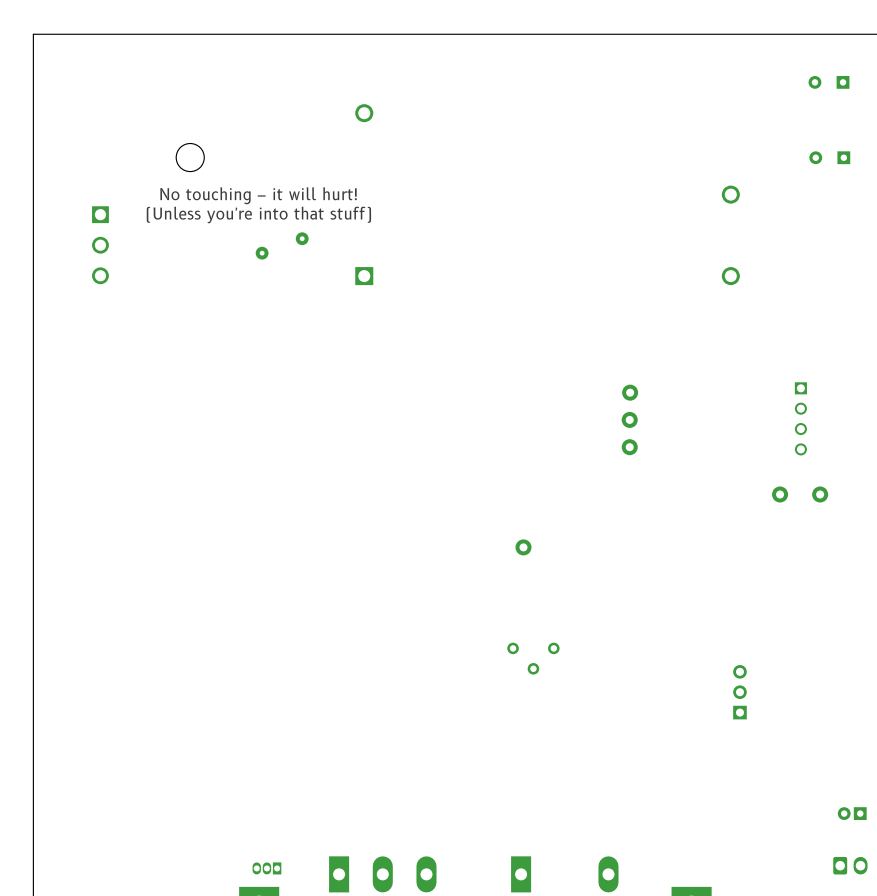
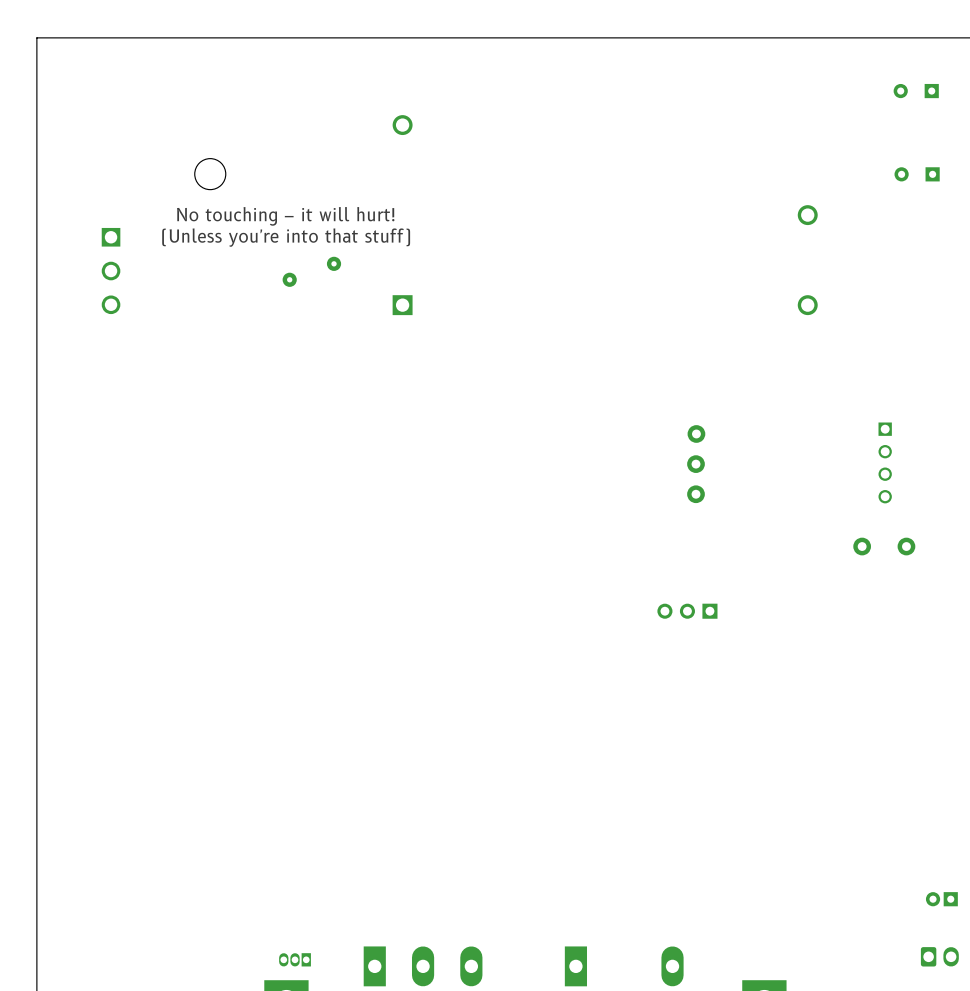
part: (523, 547) -> none
part: (533, 658) -> none
part rotation: 0° (739, 692) -> 90° counterclockwise (687, 611)
part position: (739, 692) -> (687, 611)

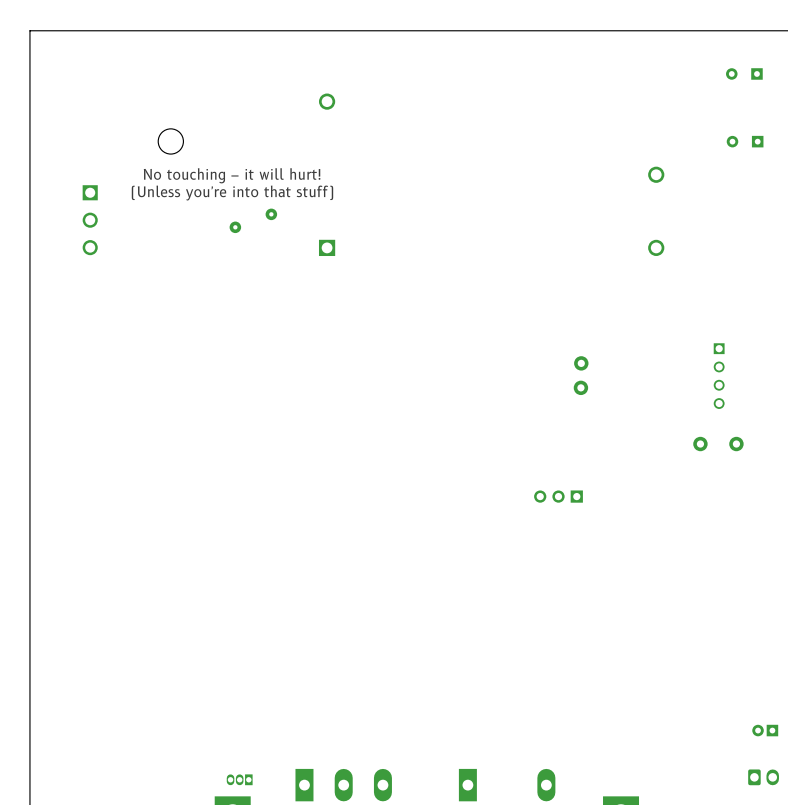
part: (696, 433) -> none
part: none -> (581, 363)
part: (696, 464) -> none
part: none -> (580, 387)
part: (696, 494) -> none

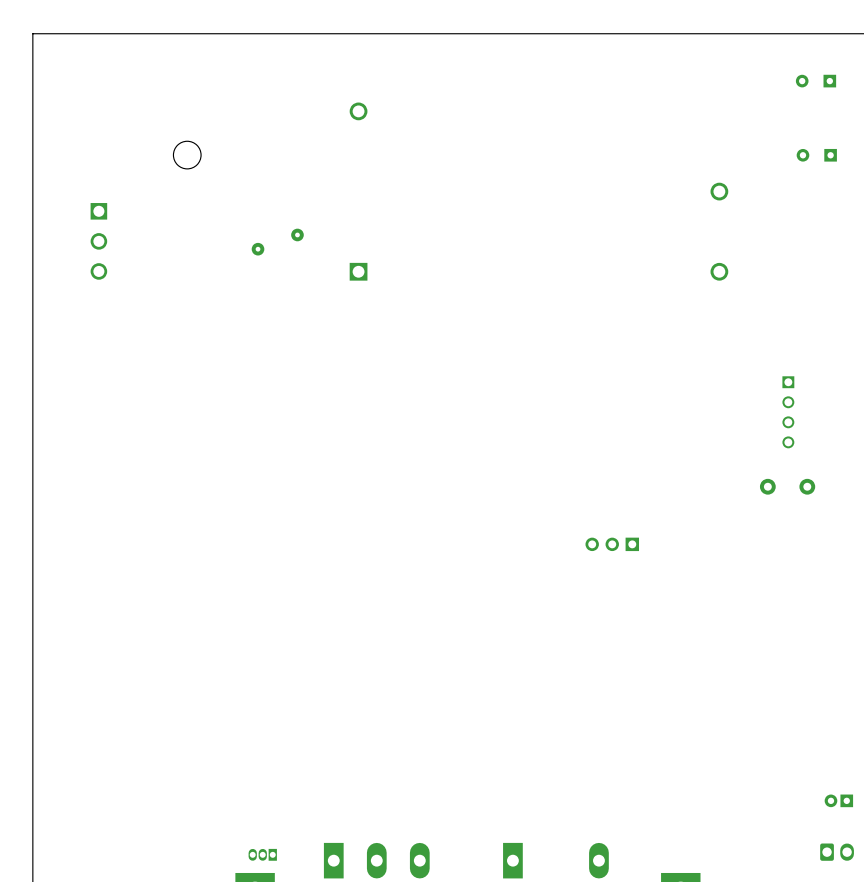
text: No touching – it will hurt! (232, 175) -> none
text: (Unless you're into that stuff) (232, 193) -> none
part: (581, 363) -> none
part: (580, 387) -> none

